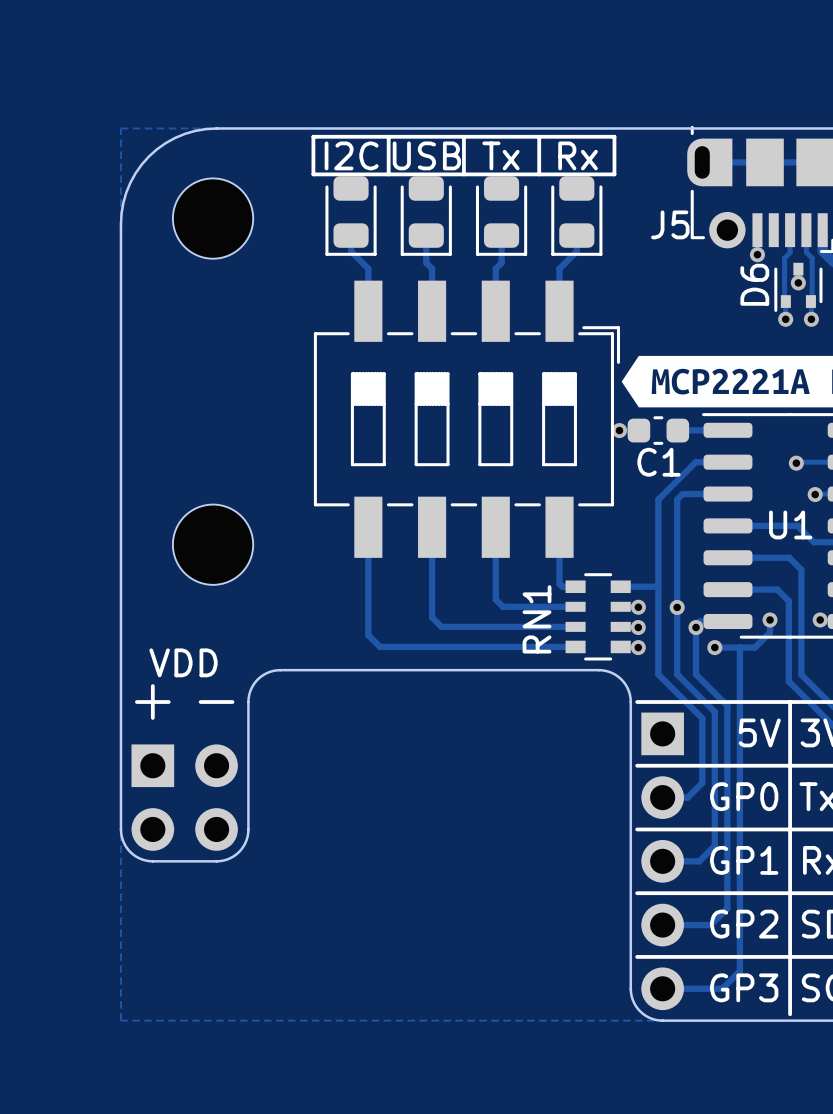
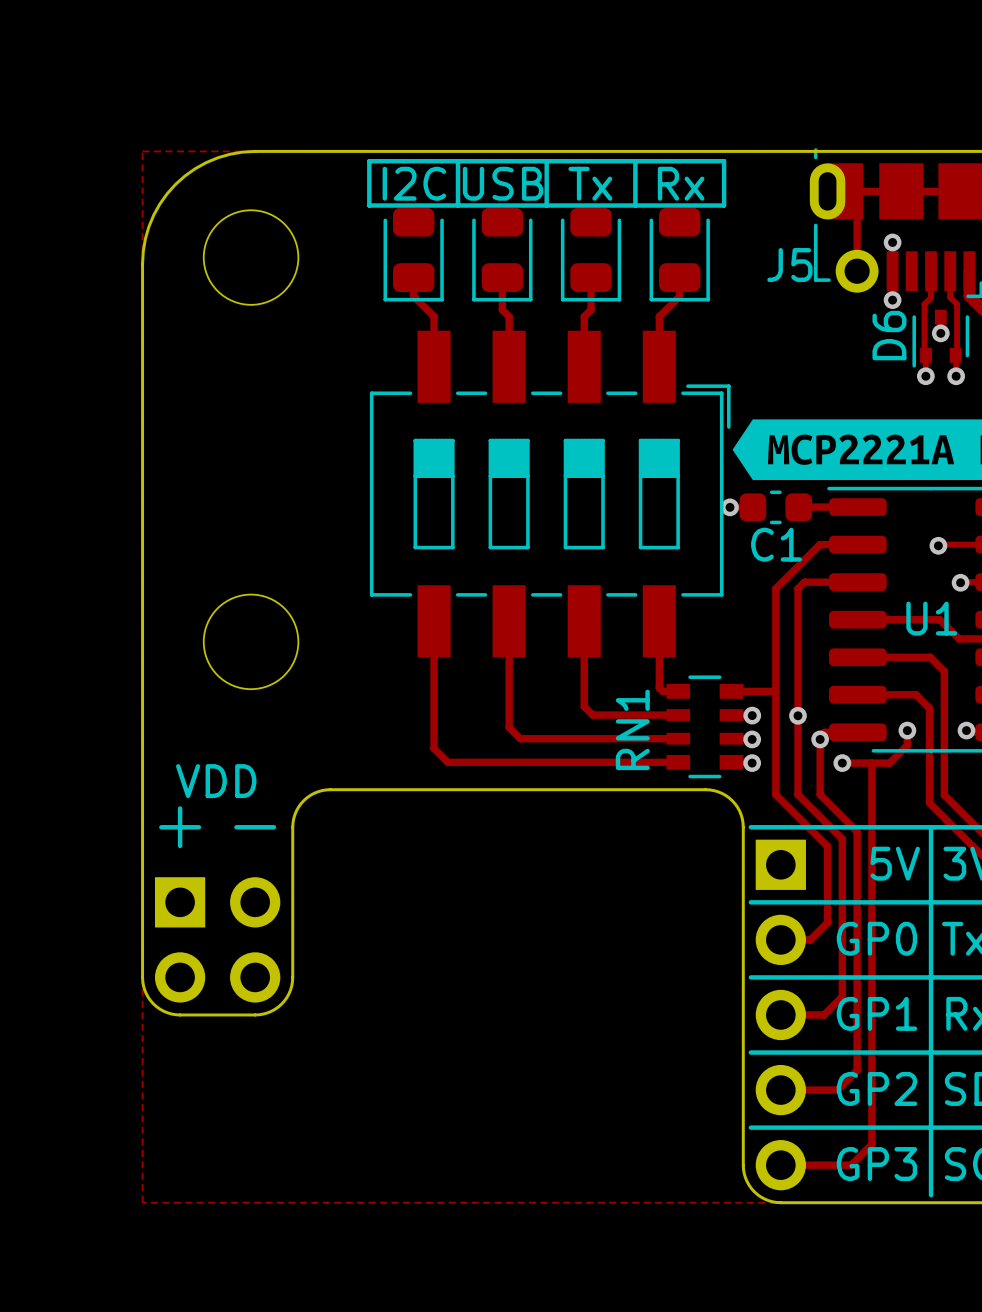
track: none -> (857, 203) (857, 271)
via: none -> (892, 242)

